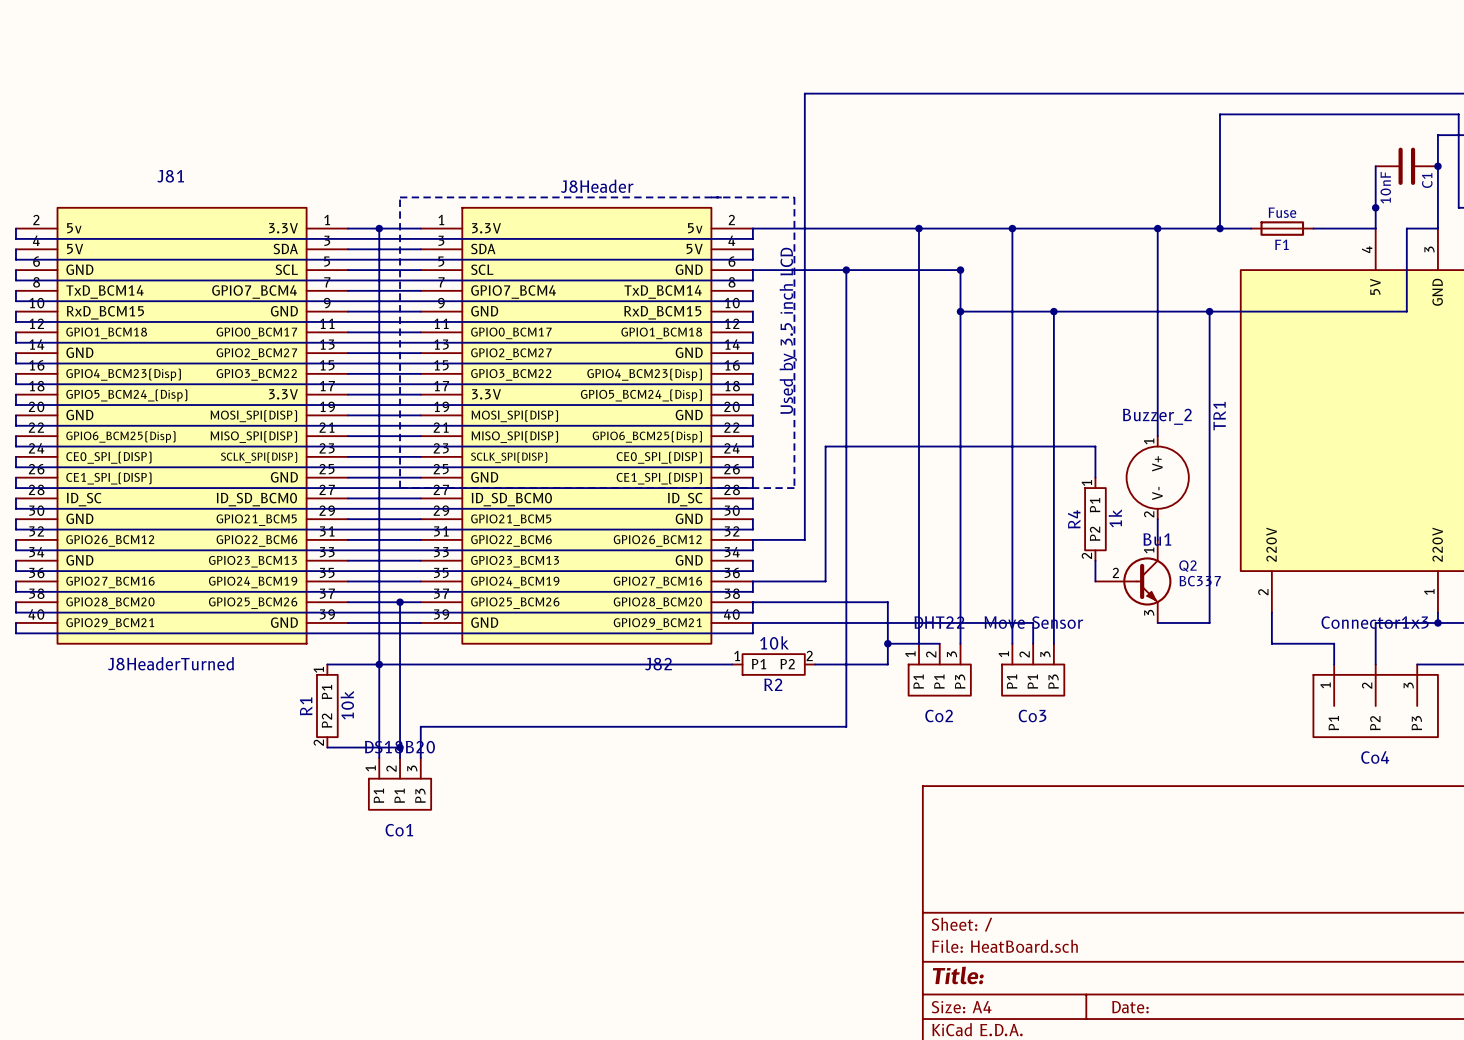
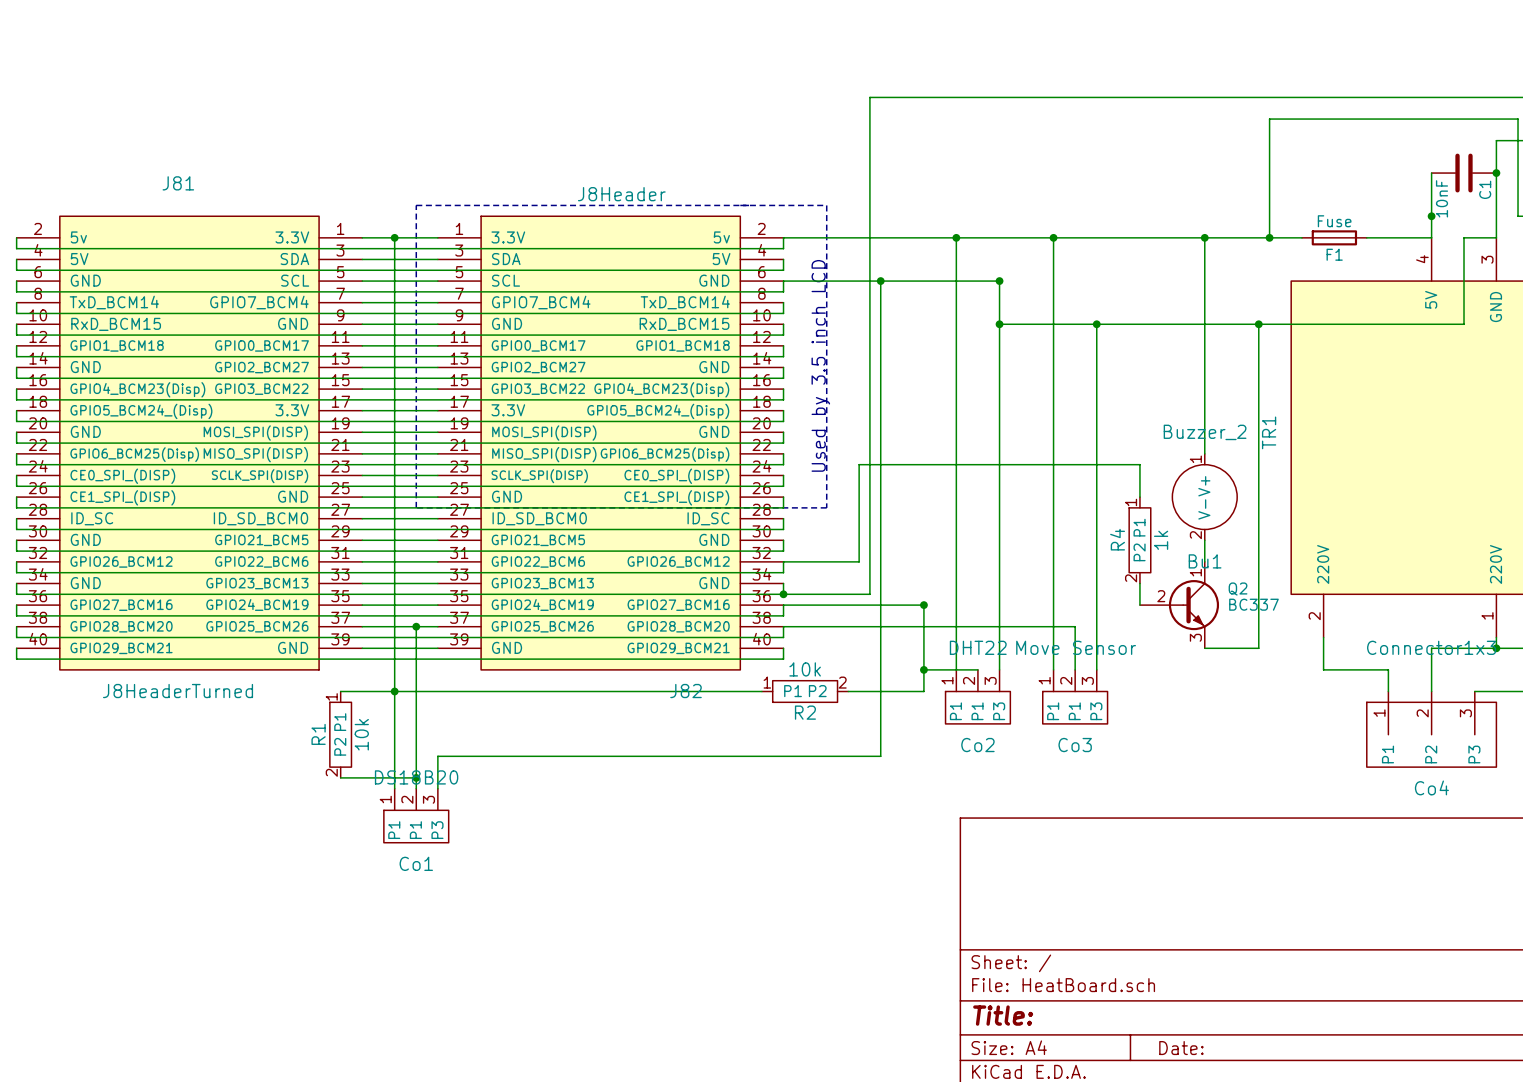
wire: (835, 93) (804, 93) (804, 539) -> (869, 97) (869, 594) (783, 594)
wire: (825, 539) (825, 581) -> (859, 561) (837, 561)
junction: none -> (783, 594)
junction: none -> (923, 605)
wire: (752, 622) (1033, 622) -> (859, 605) (923, 605) (923, 626) (1075, 626) (1075, 648)

